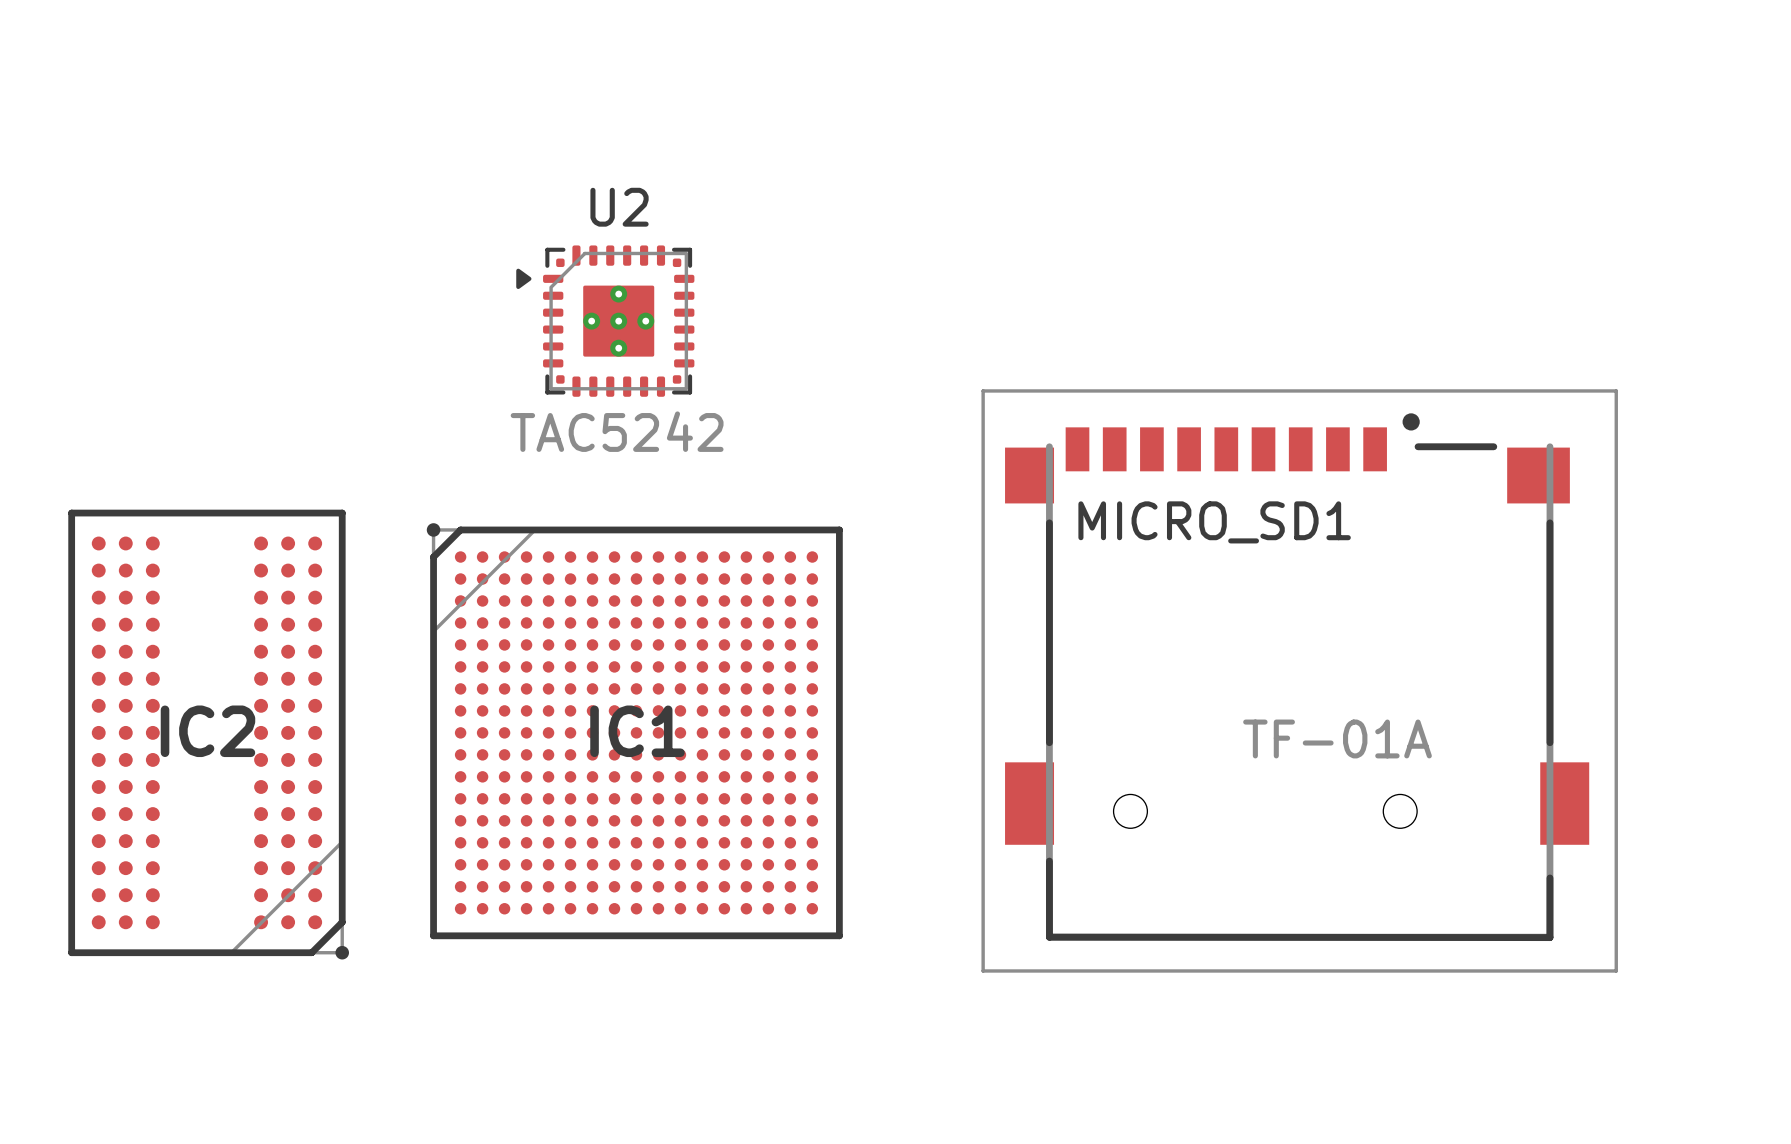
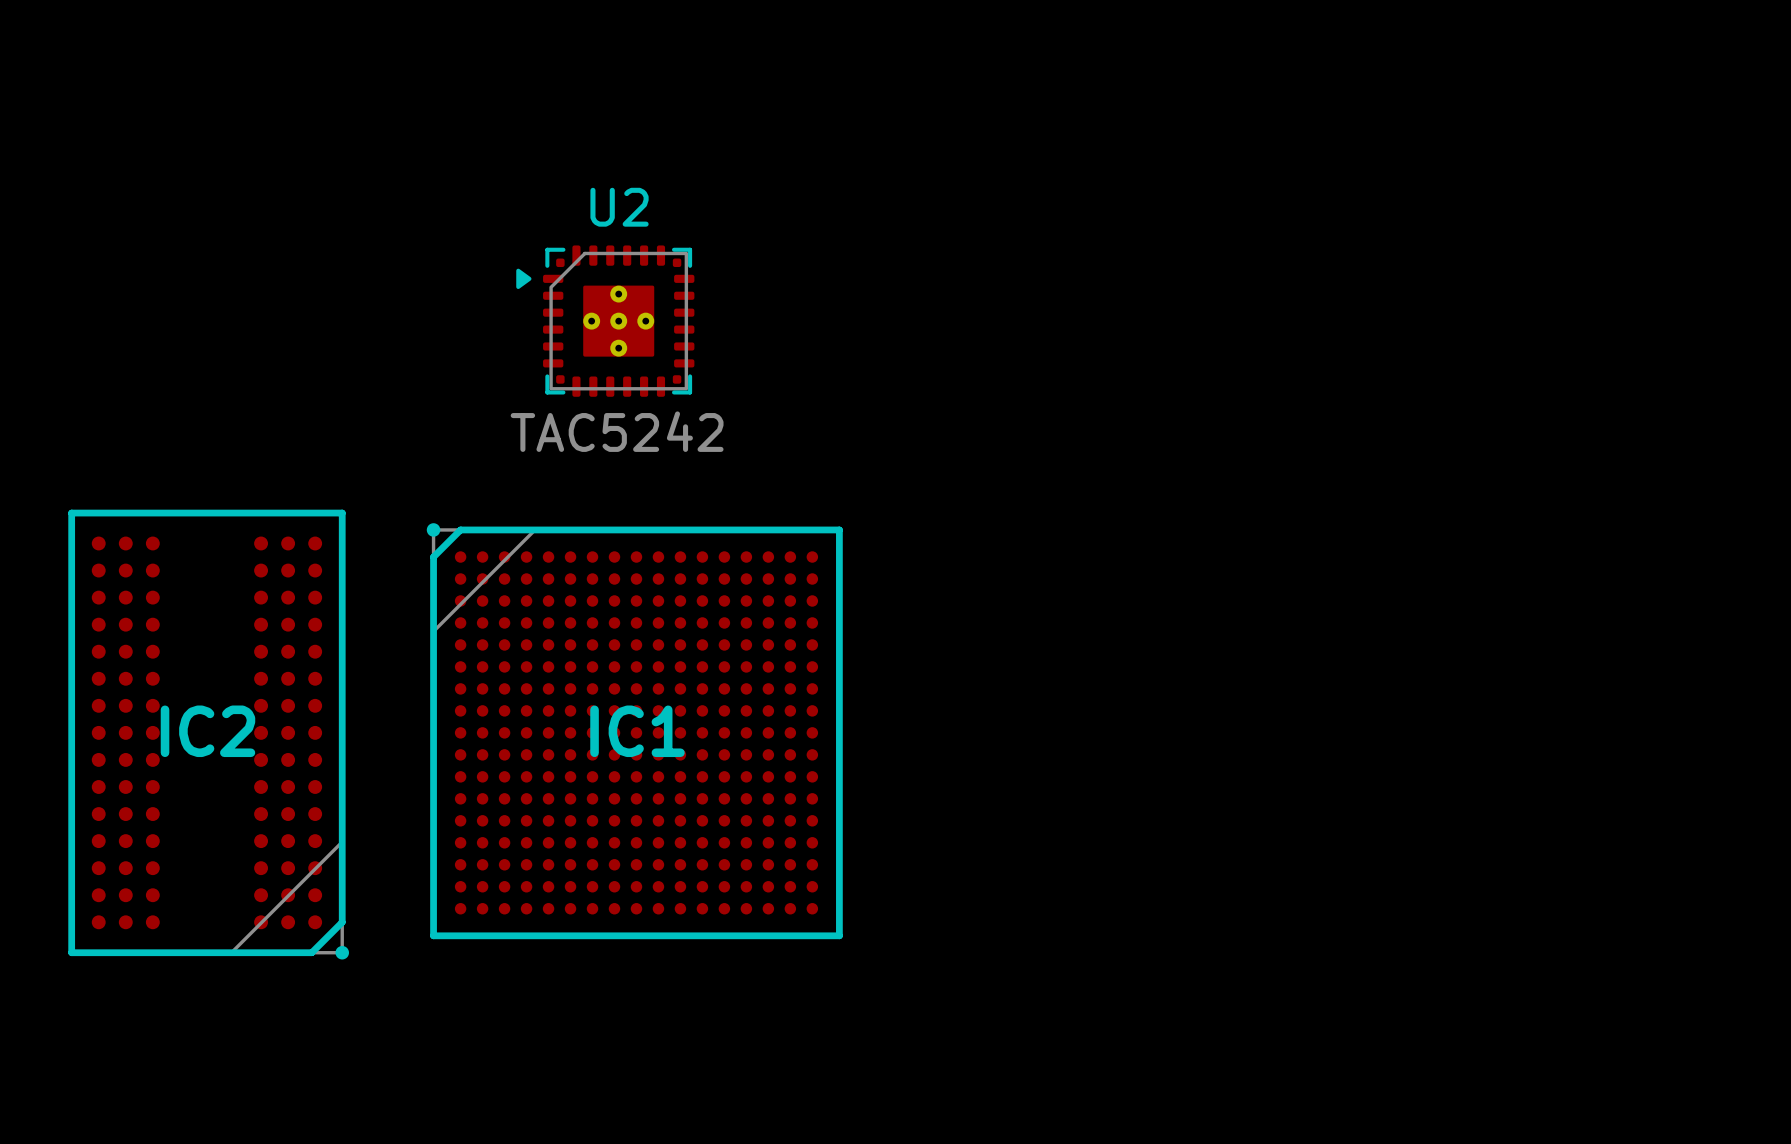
MICRO_SD1: TF-01A (1299, 680) -> none

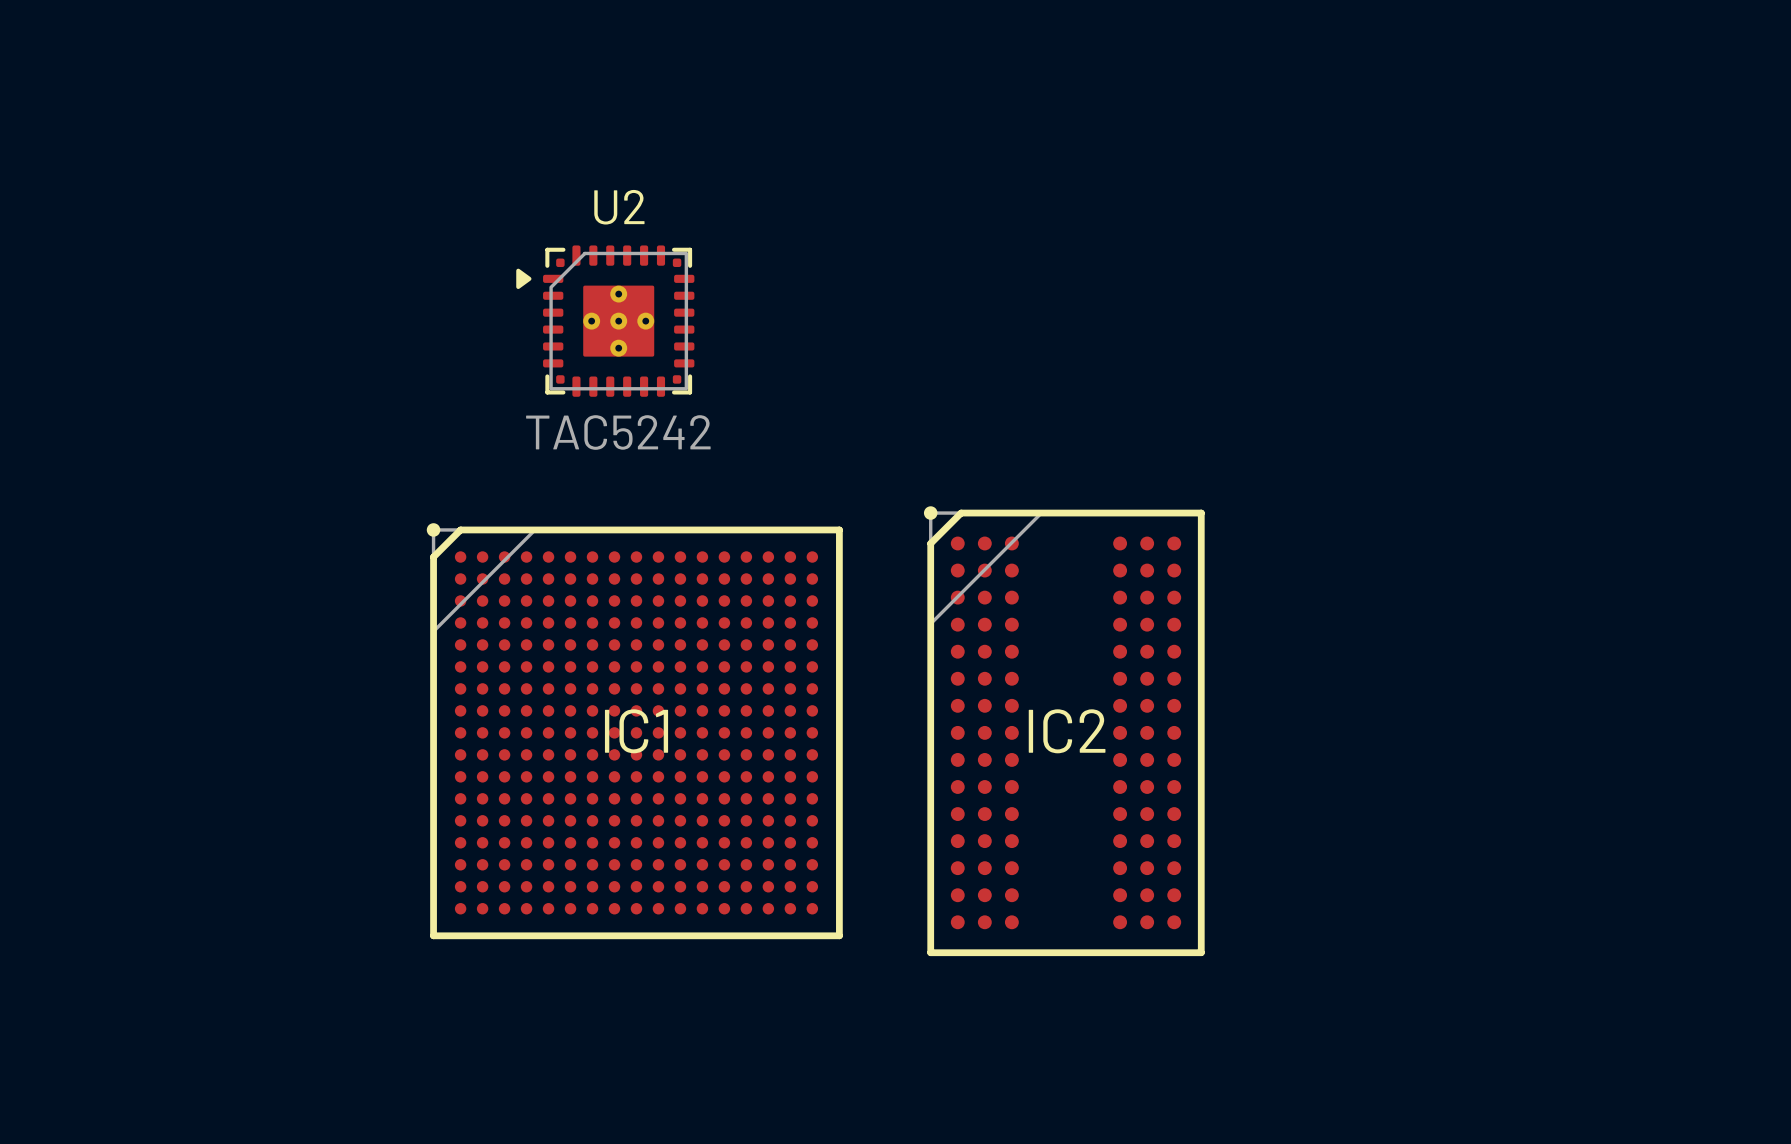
IC2 rotation: 0° (208, 734) -> 180° (1064, 731)
IC2 position: (208, 734) -> (1064, 731)

